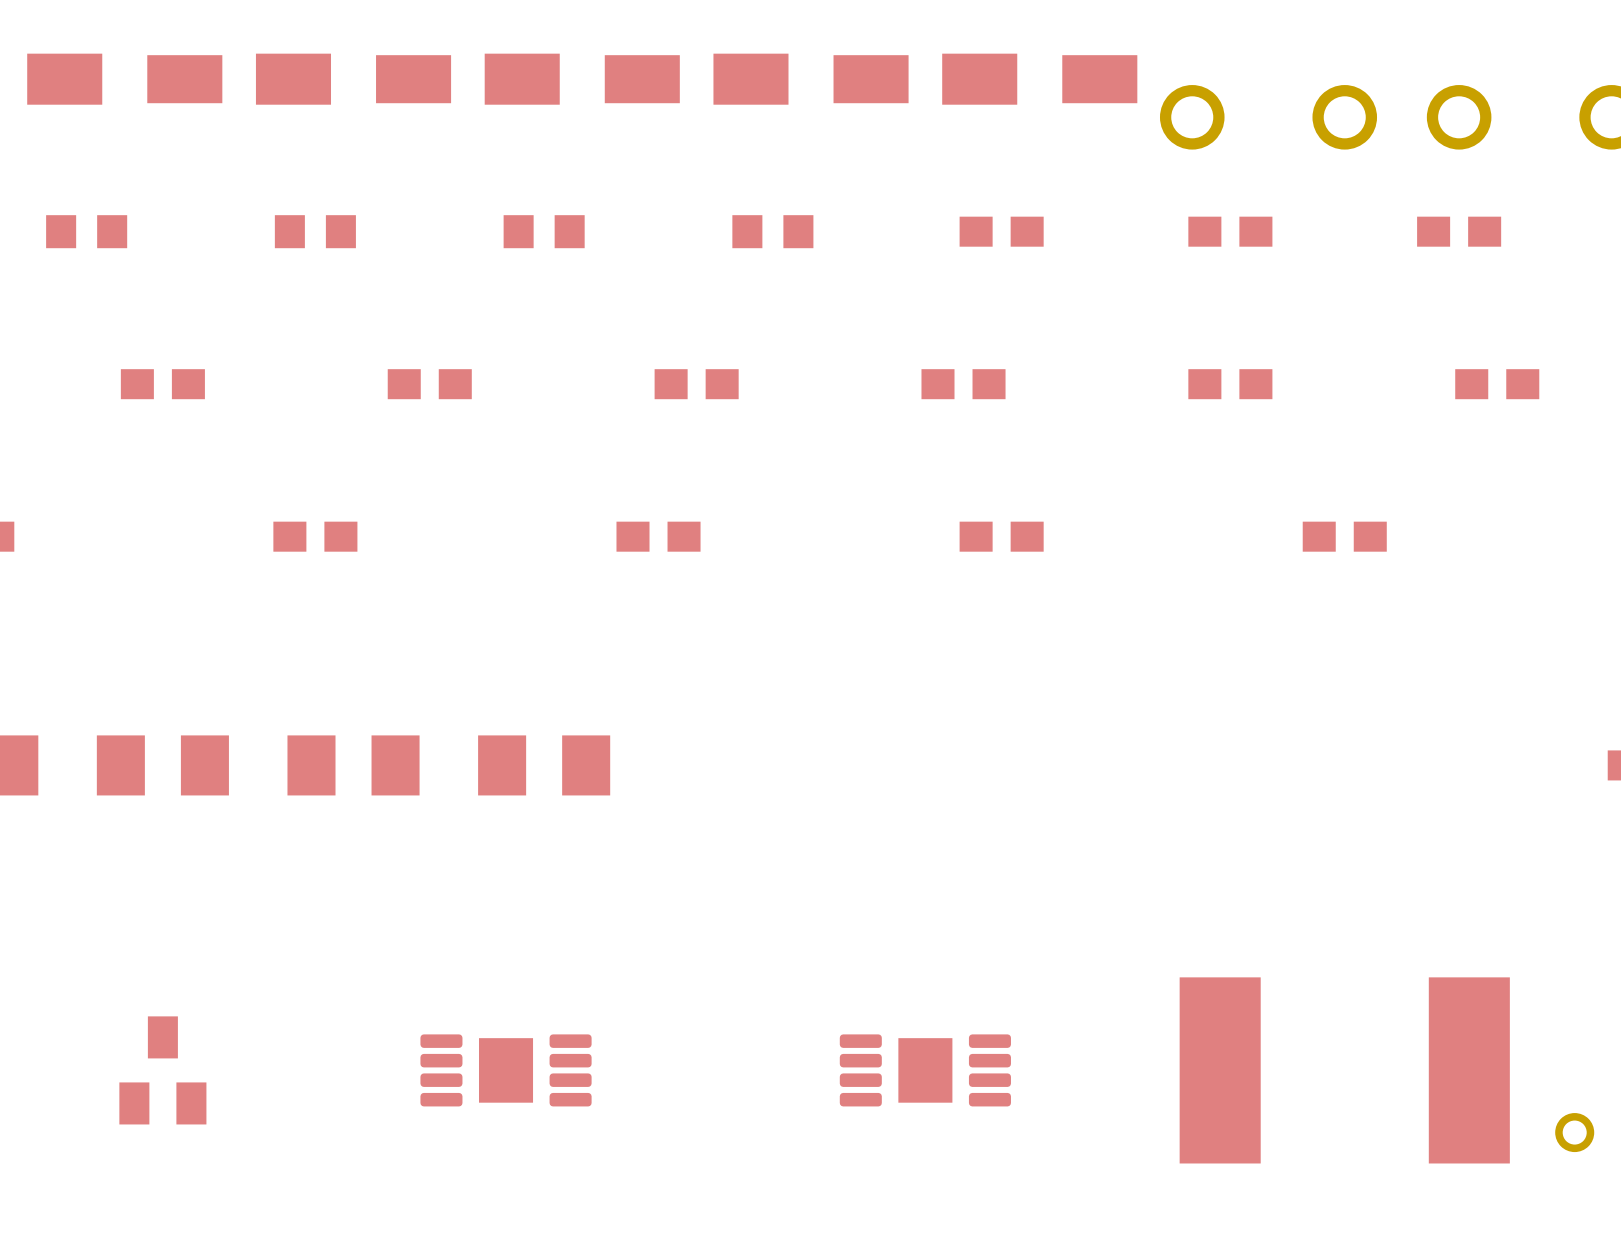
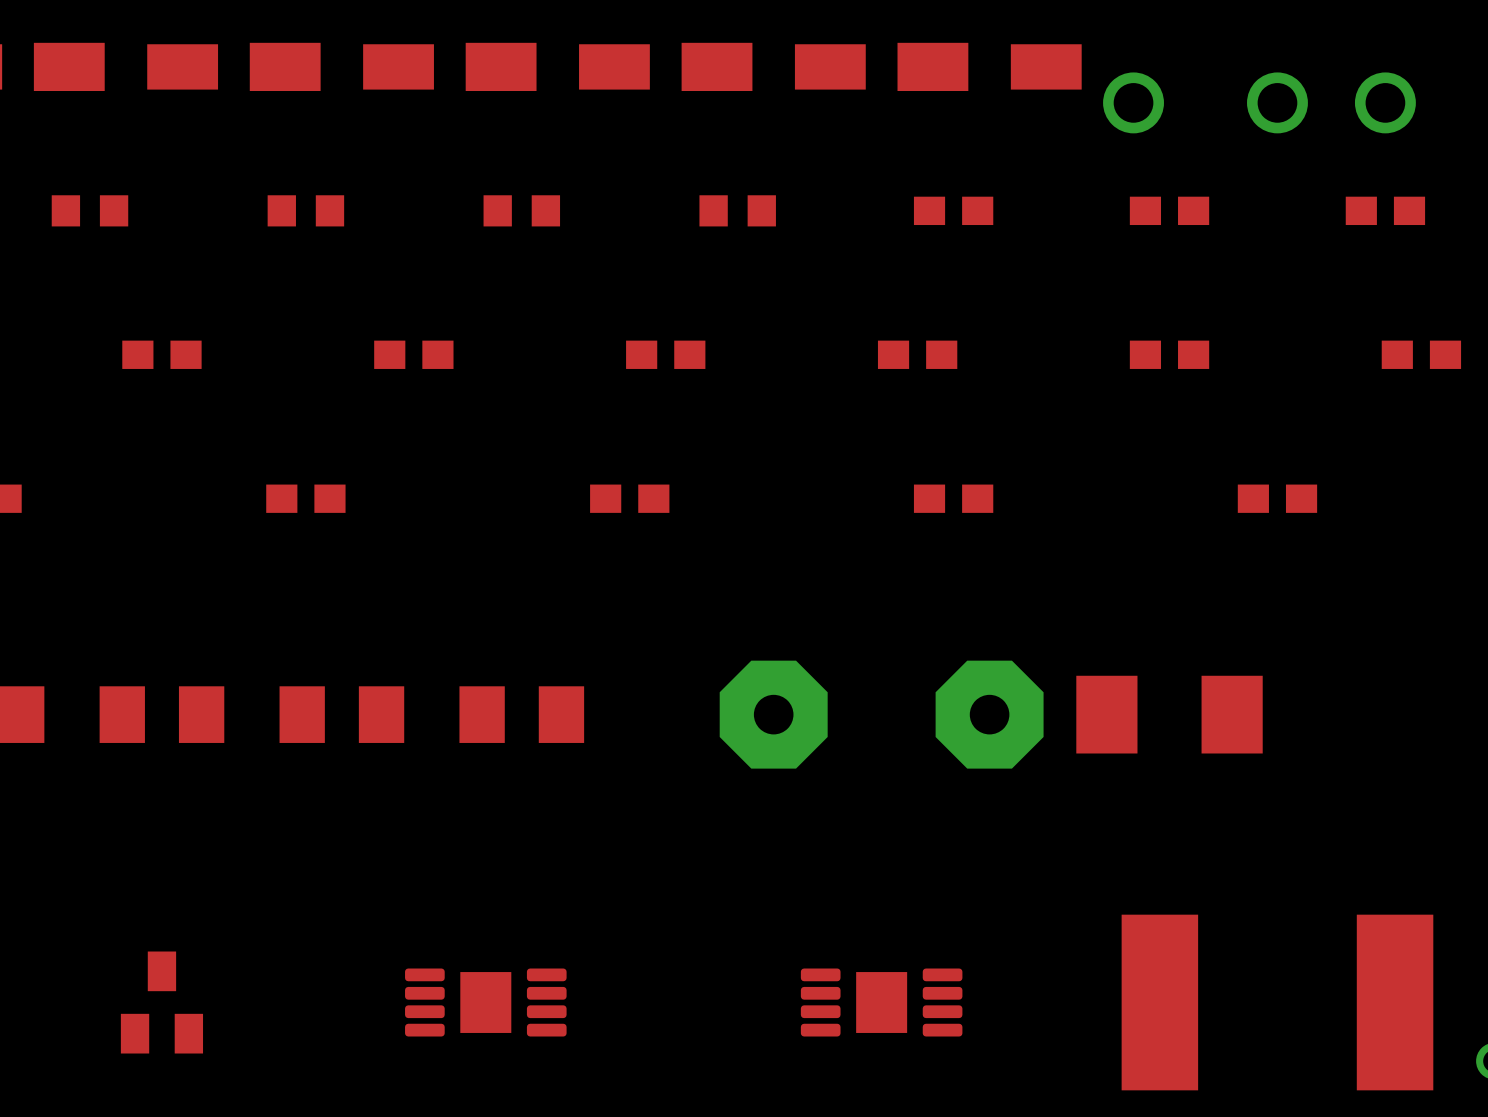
part: none -> (773, 714)
part: none -> (989, 714)
part: none -> (1169, 714)

